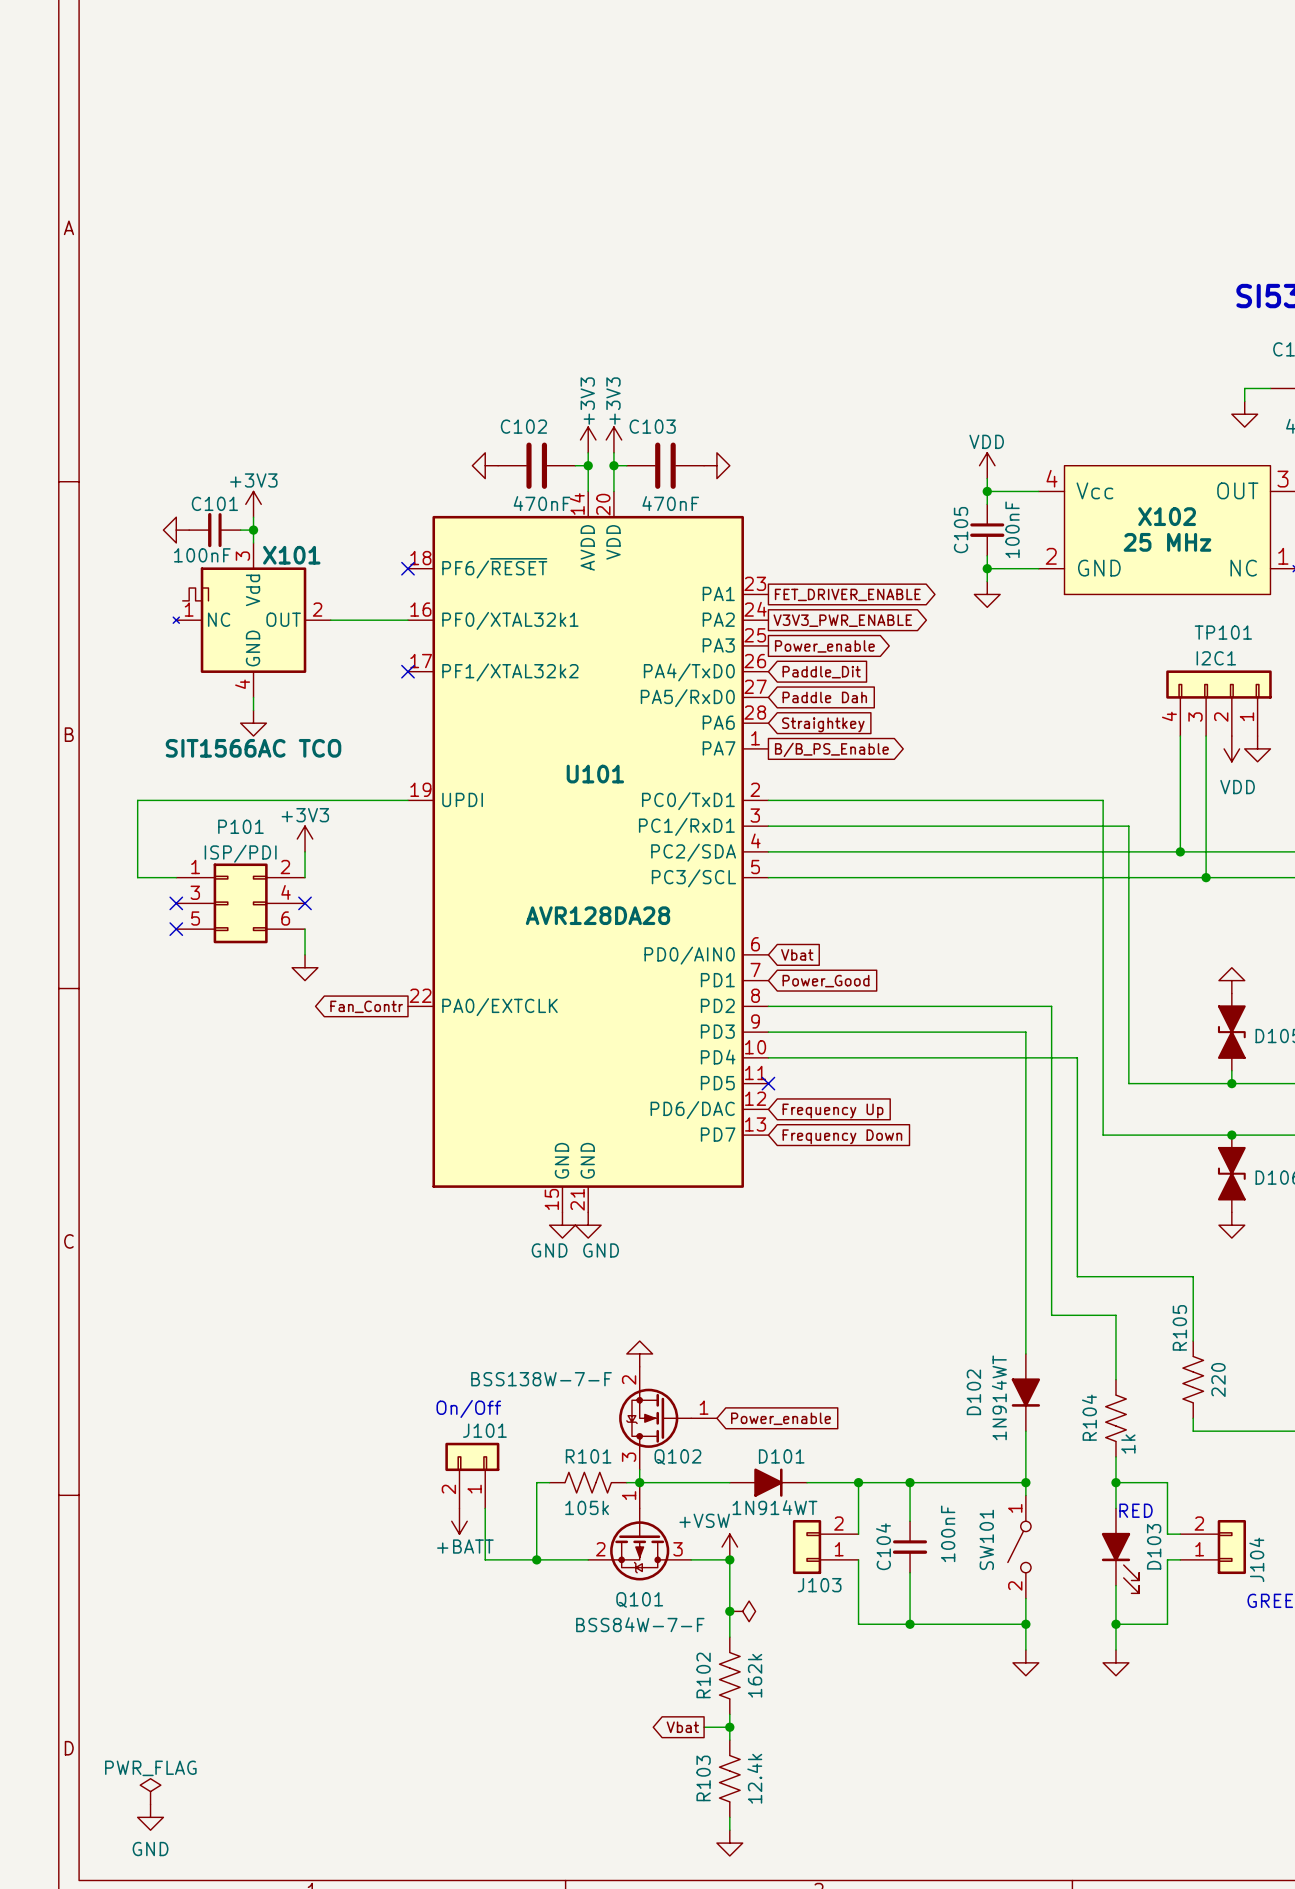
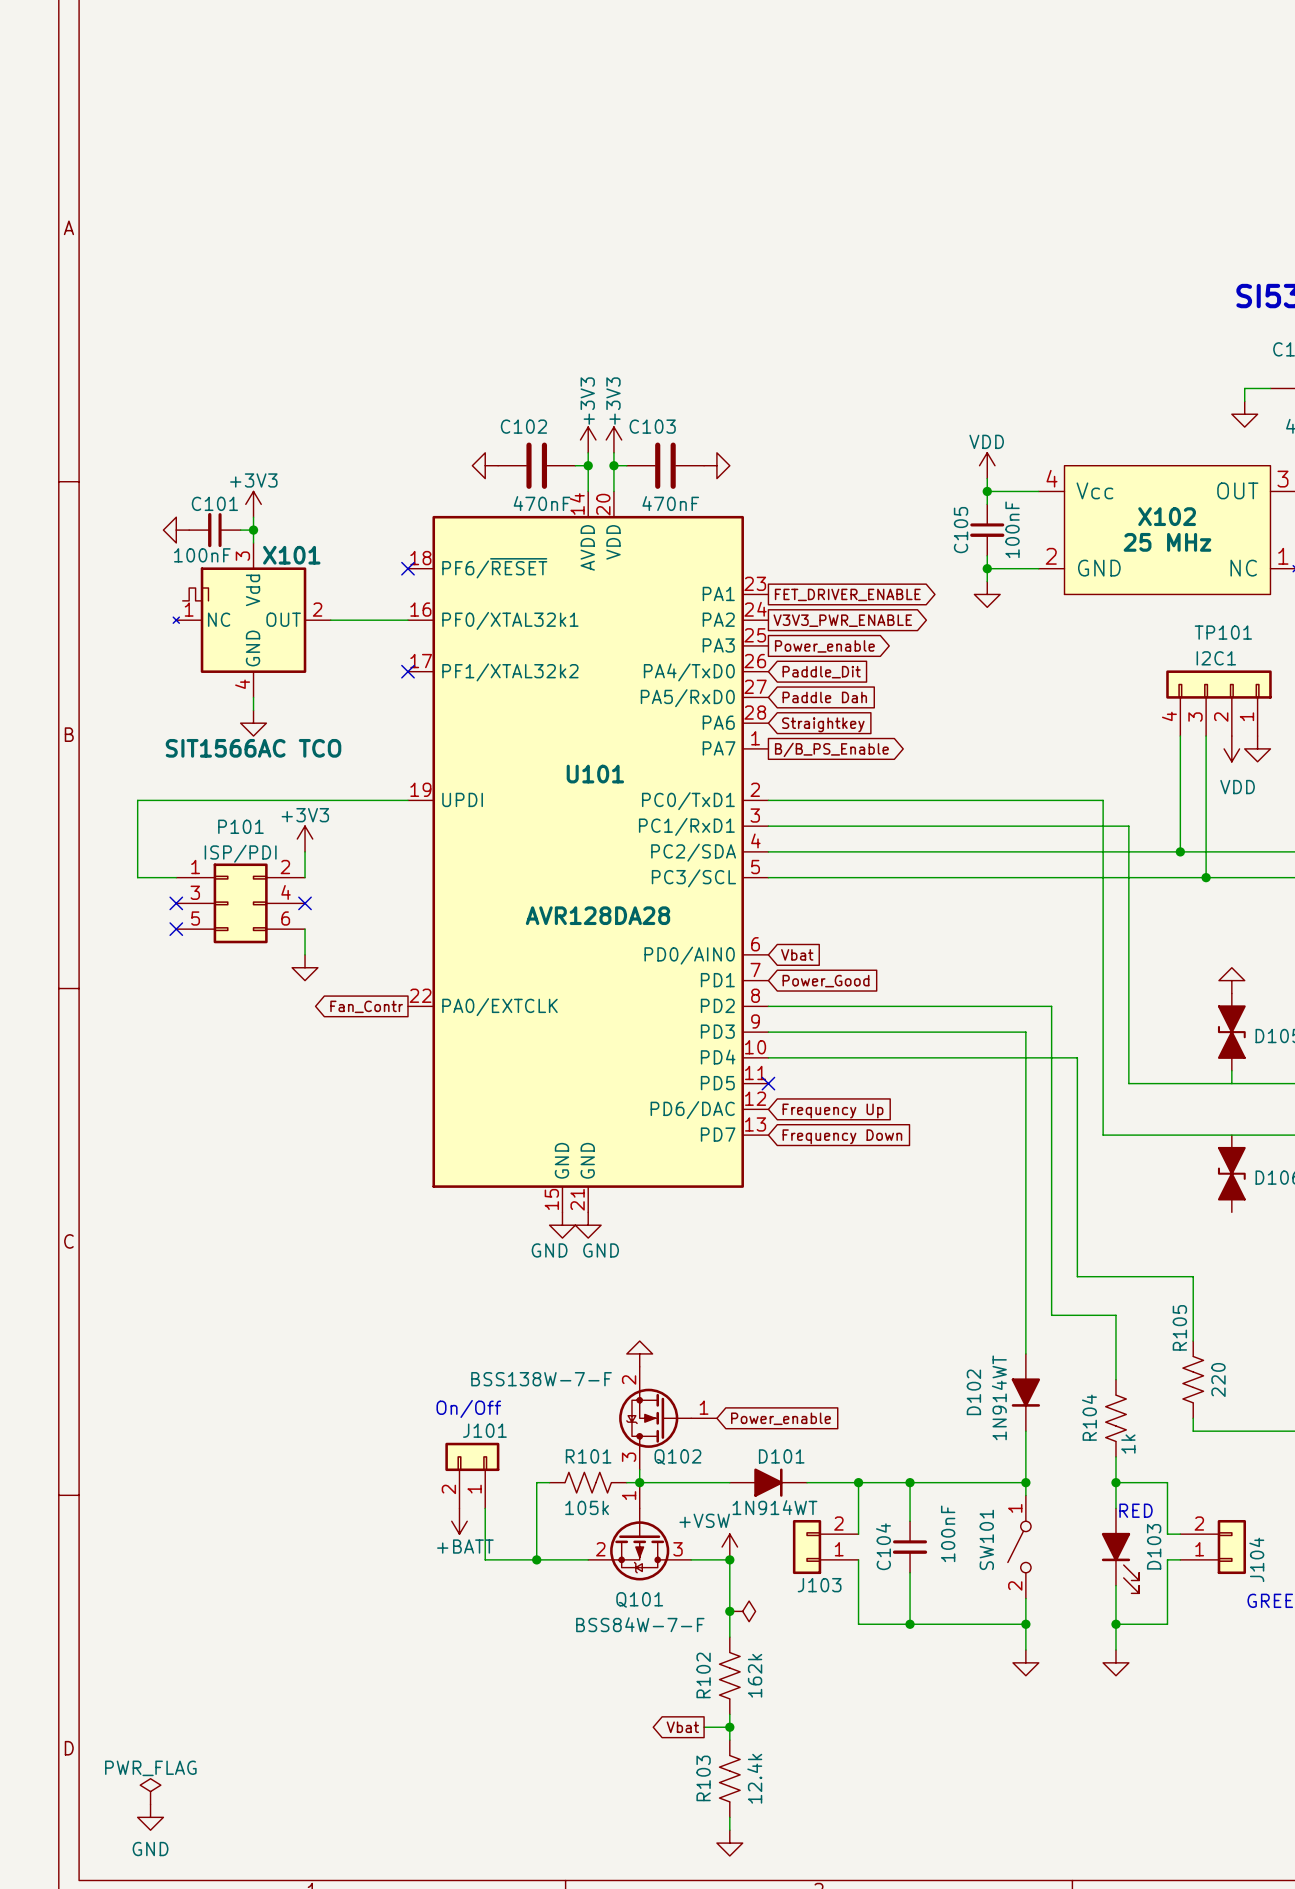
junction: (1231, 1083) -> none
junction: (1231, 1135) -> none
power symbol: (1231, 1225) -> none

